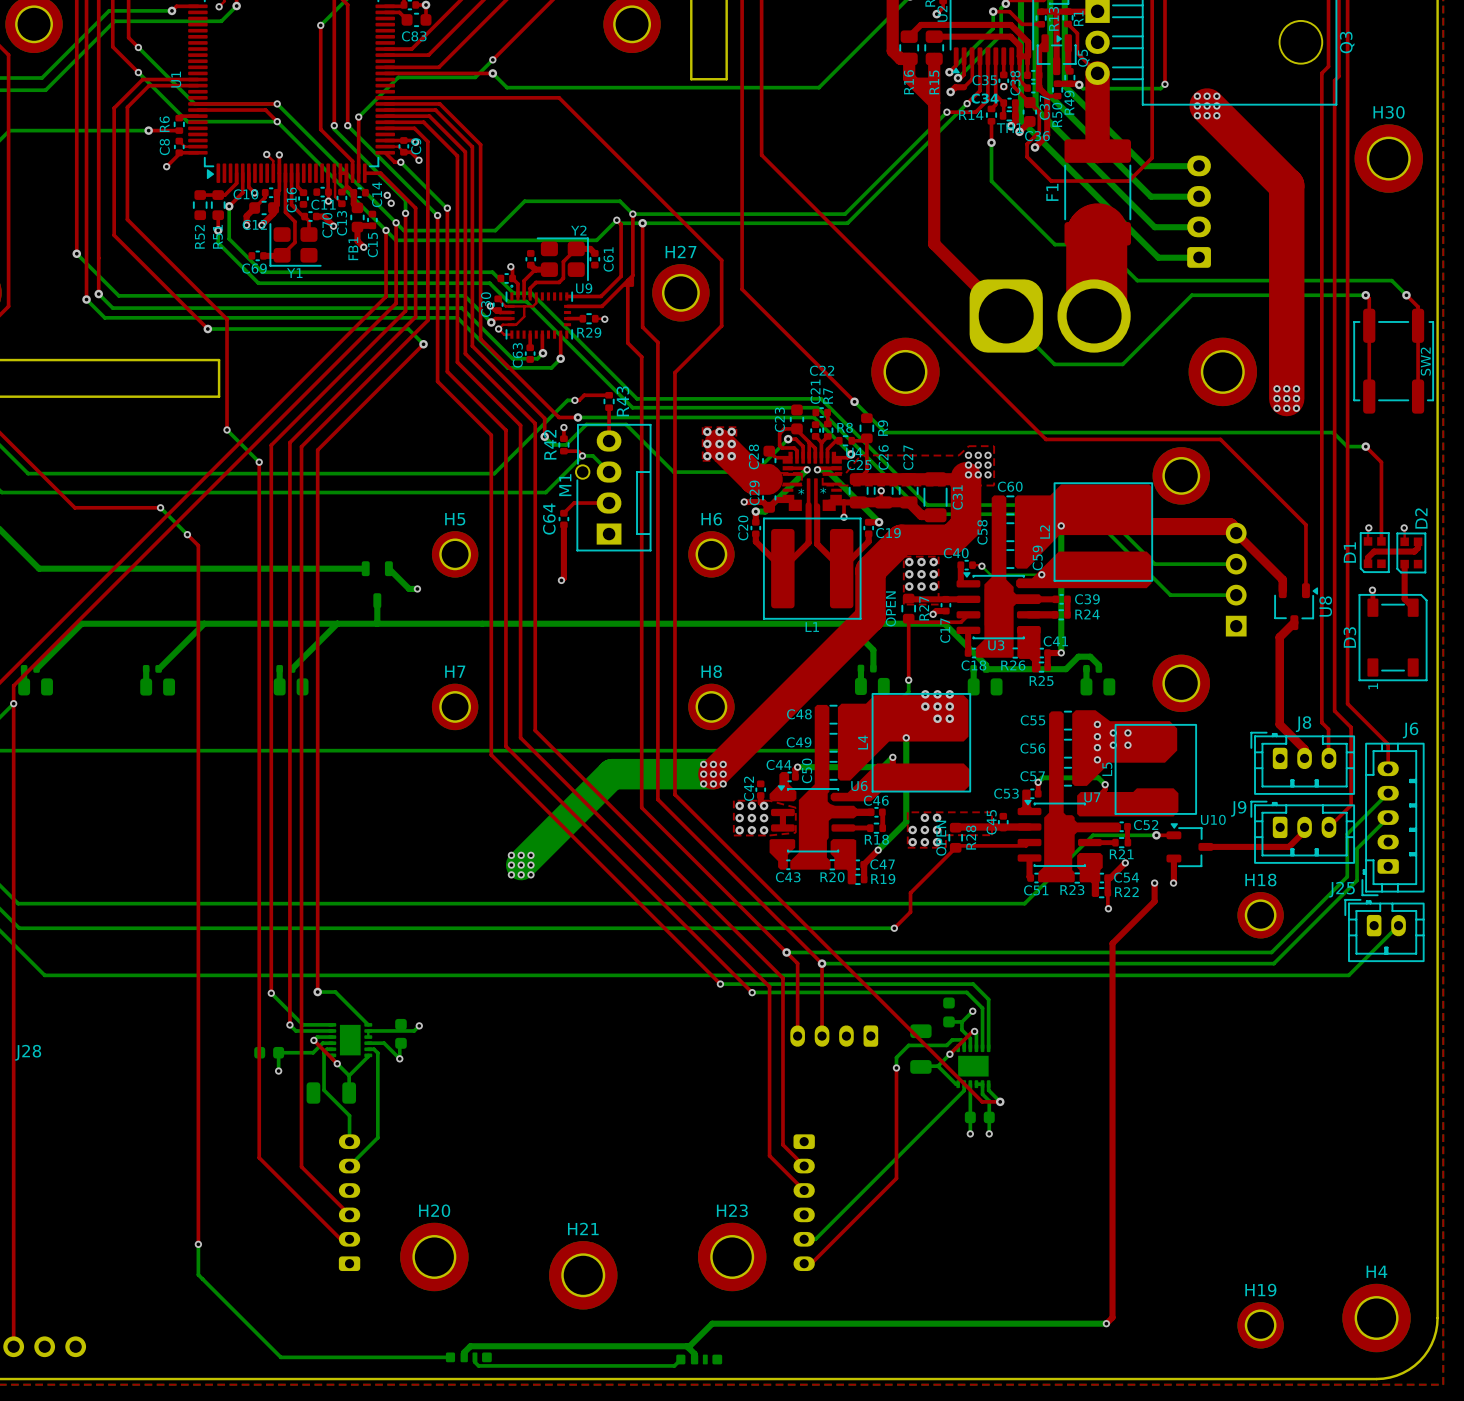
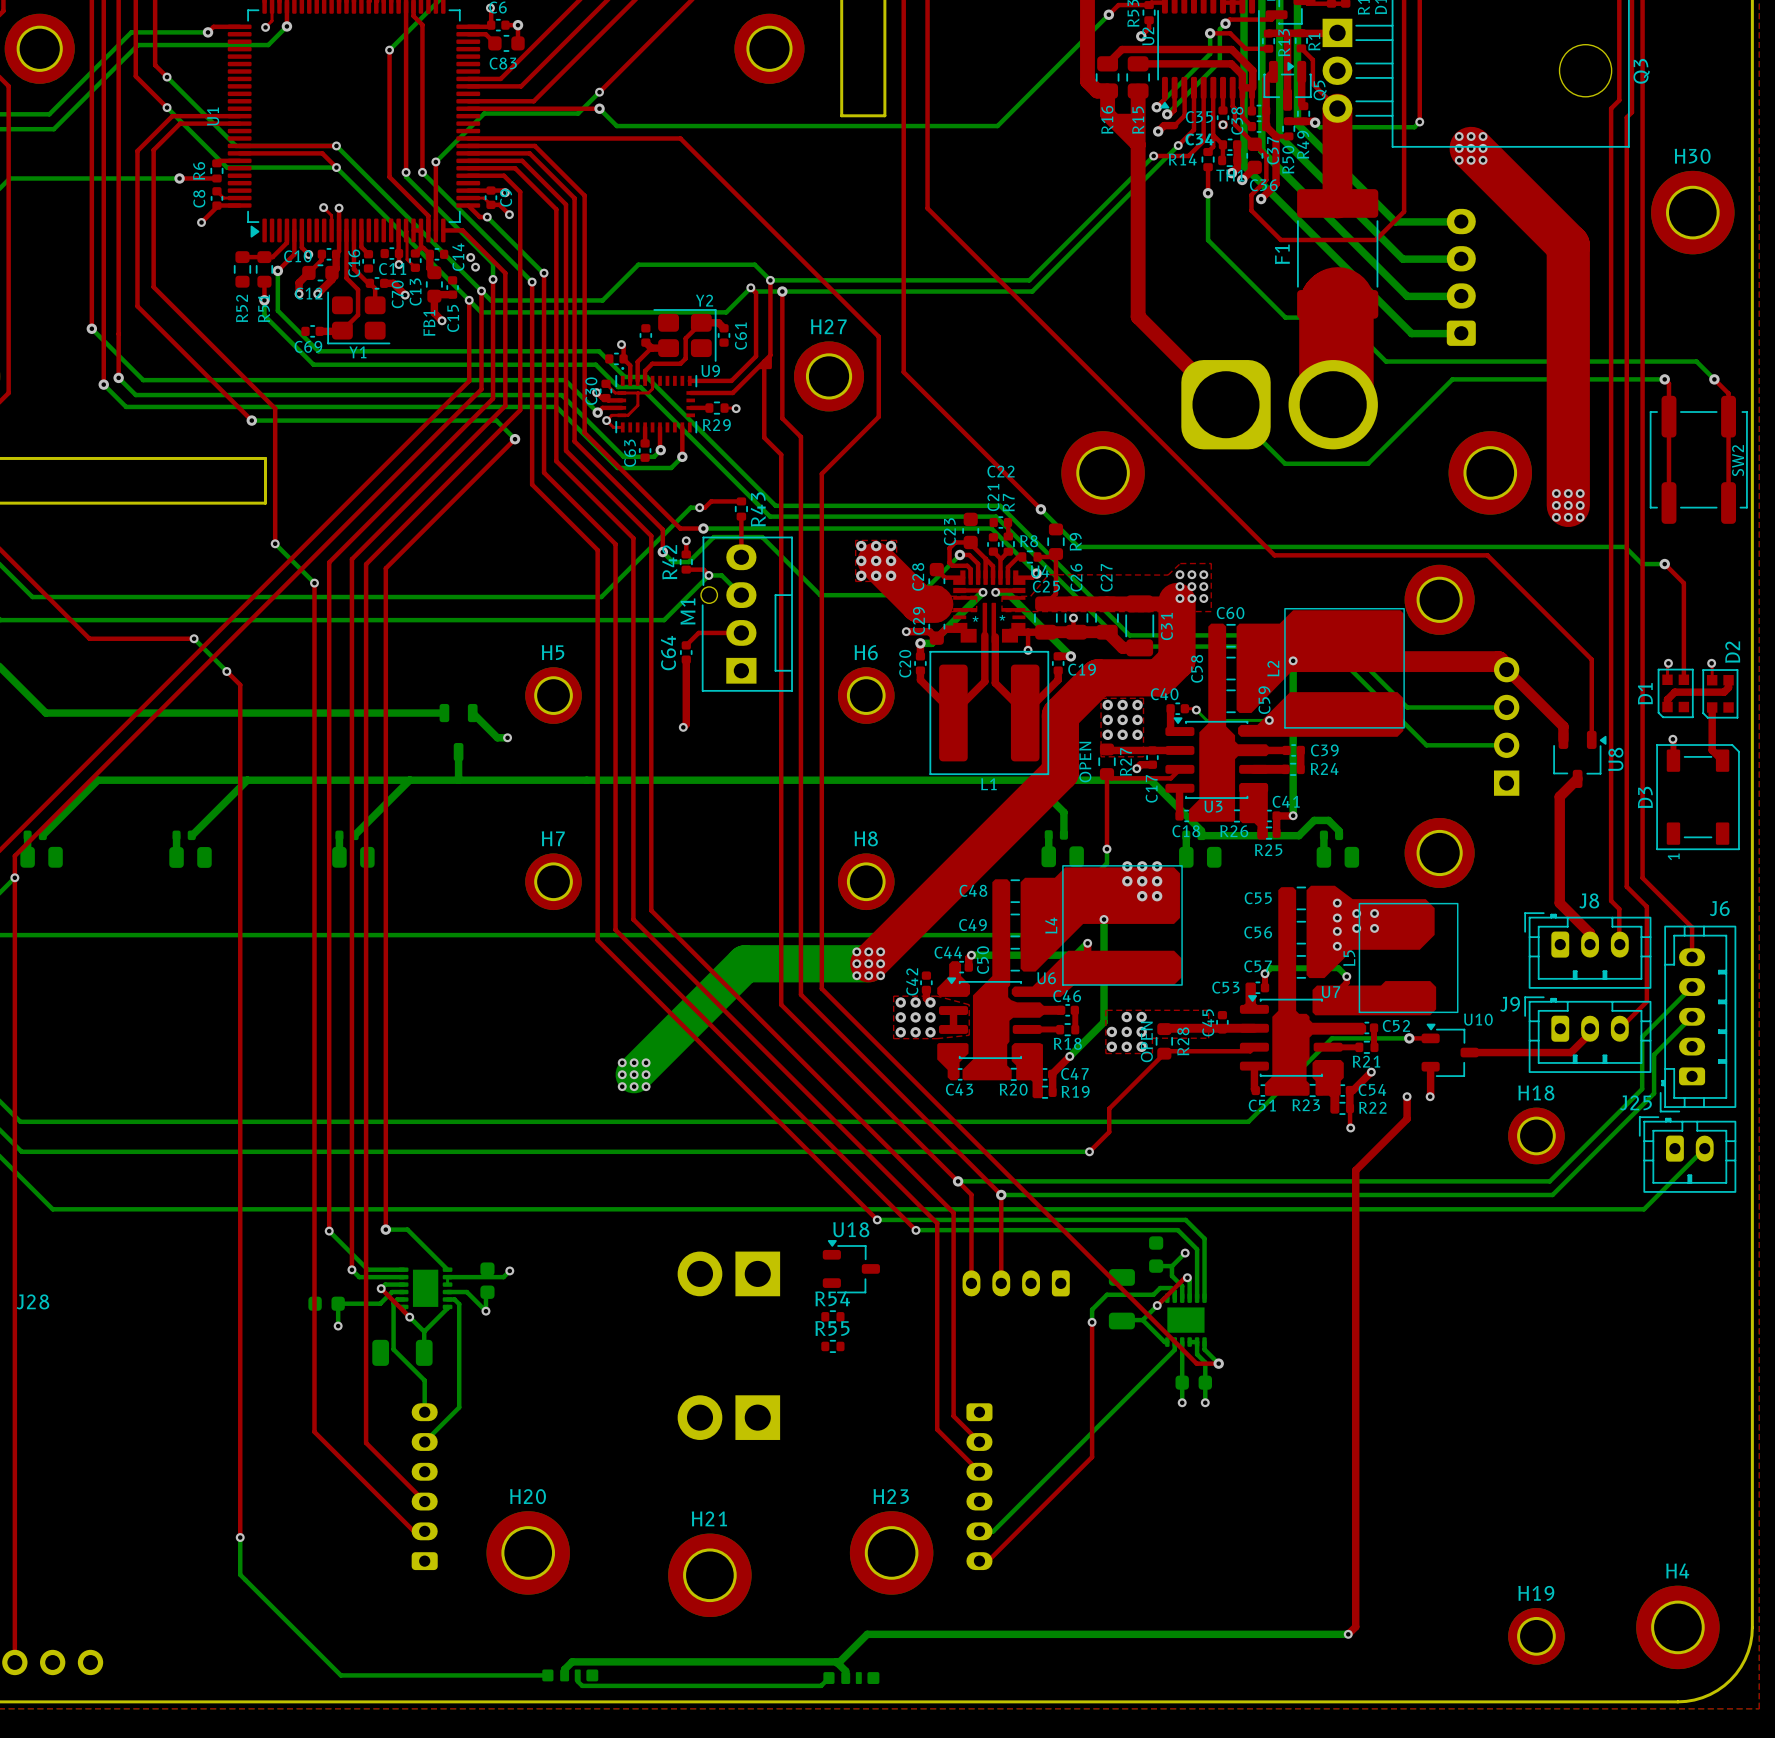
U18: none -> (851, 1266)
part: none -> (728, 1273)
R54: none -> (832, 1316)
R55: none -> (832, 1346)
part: none -> (728, 1417)

